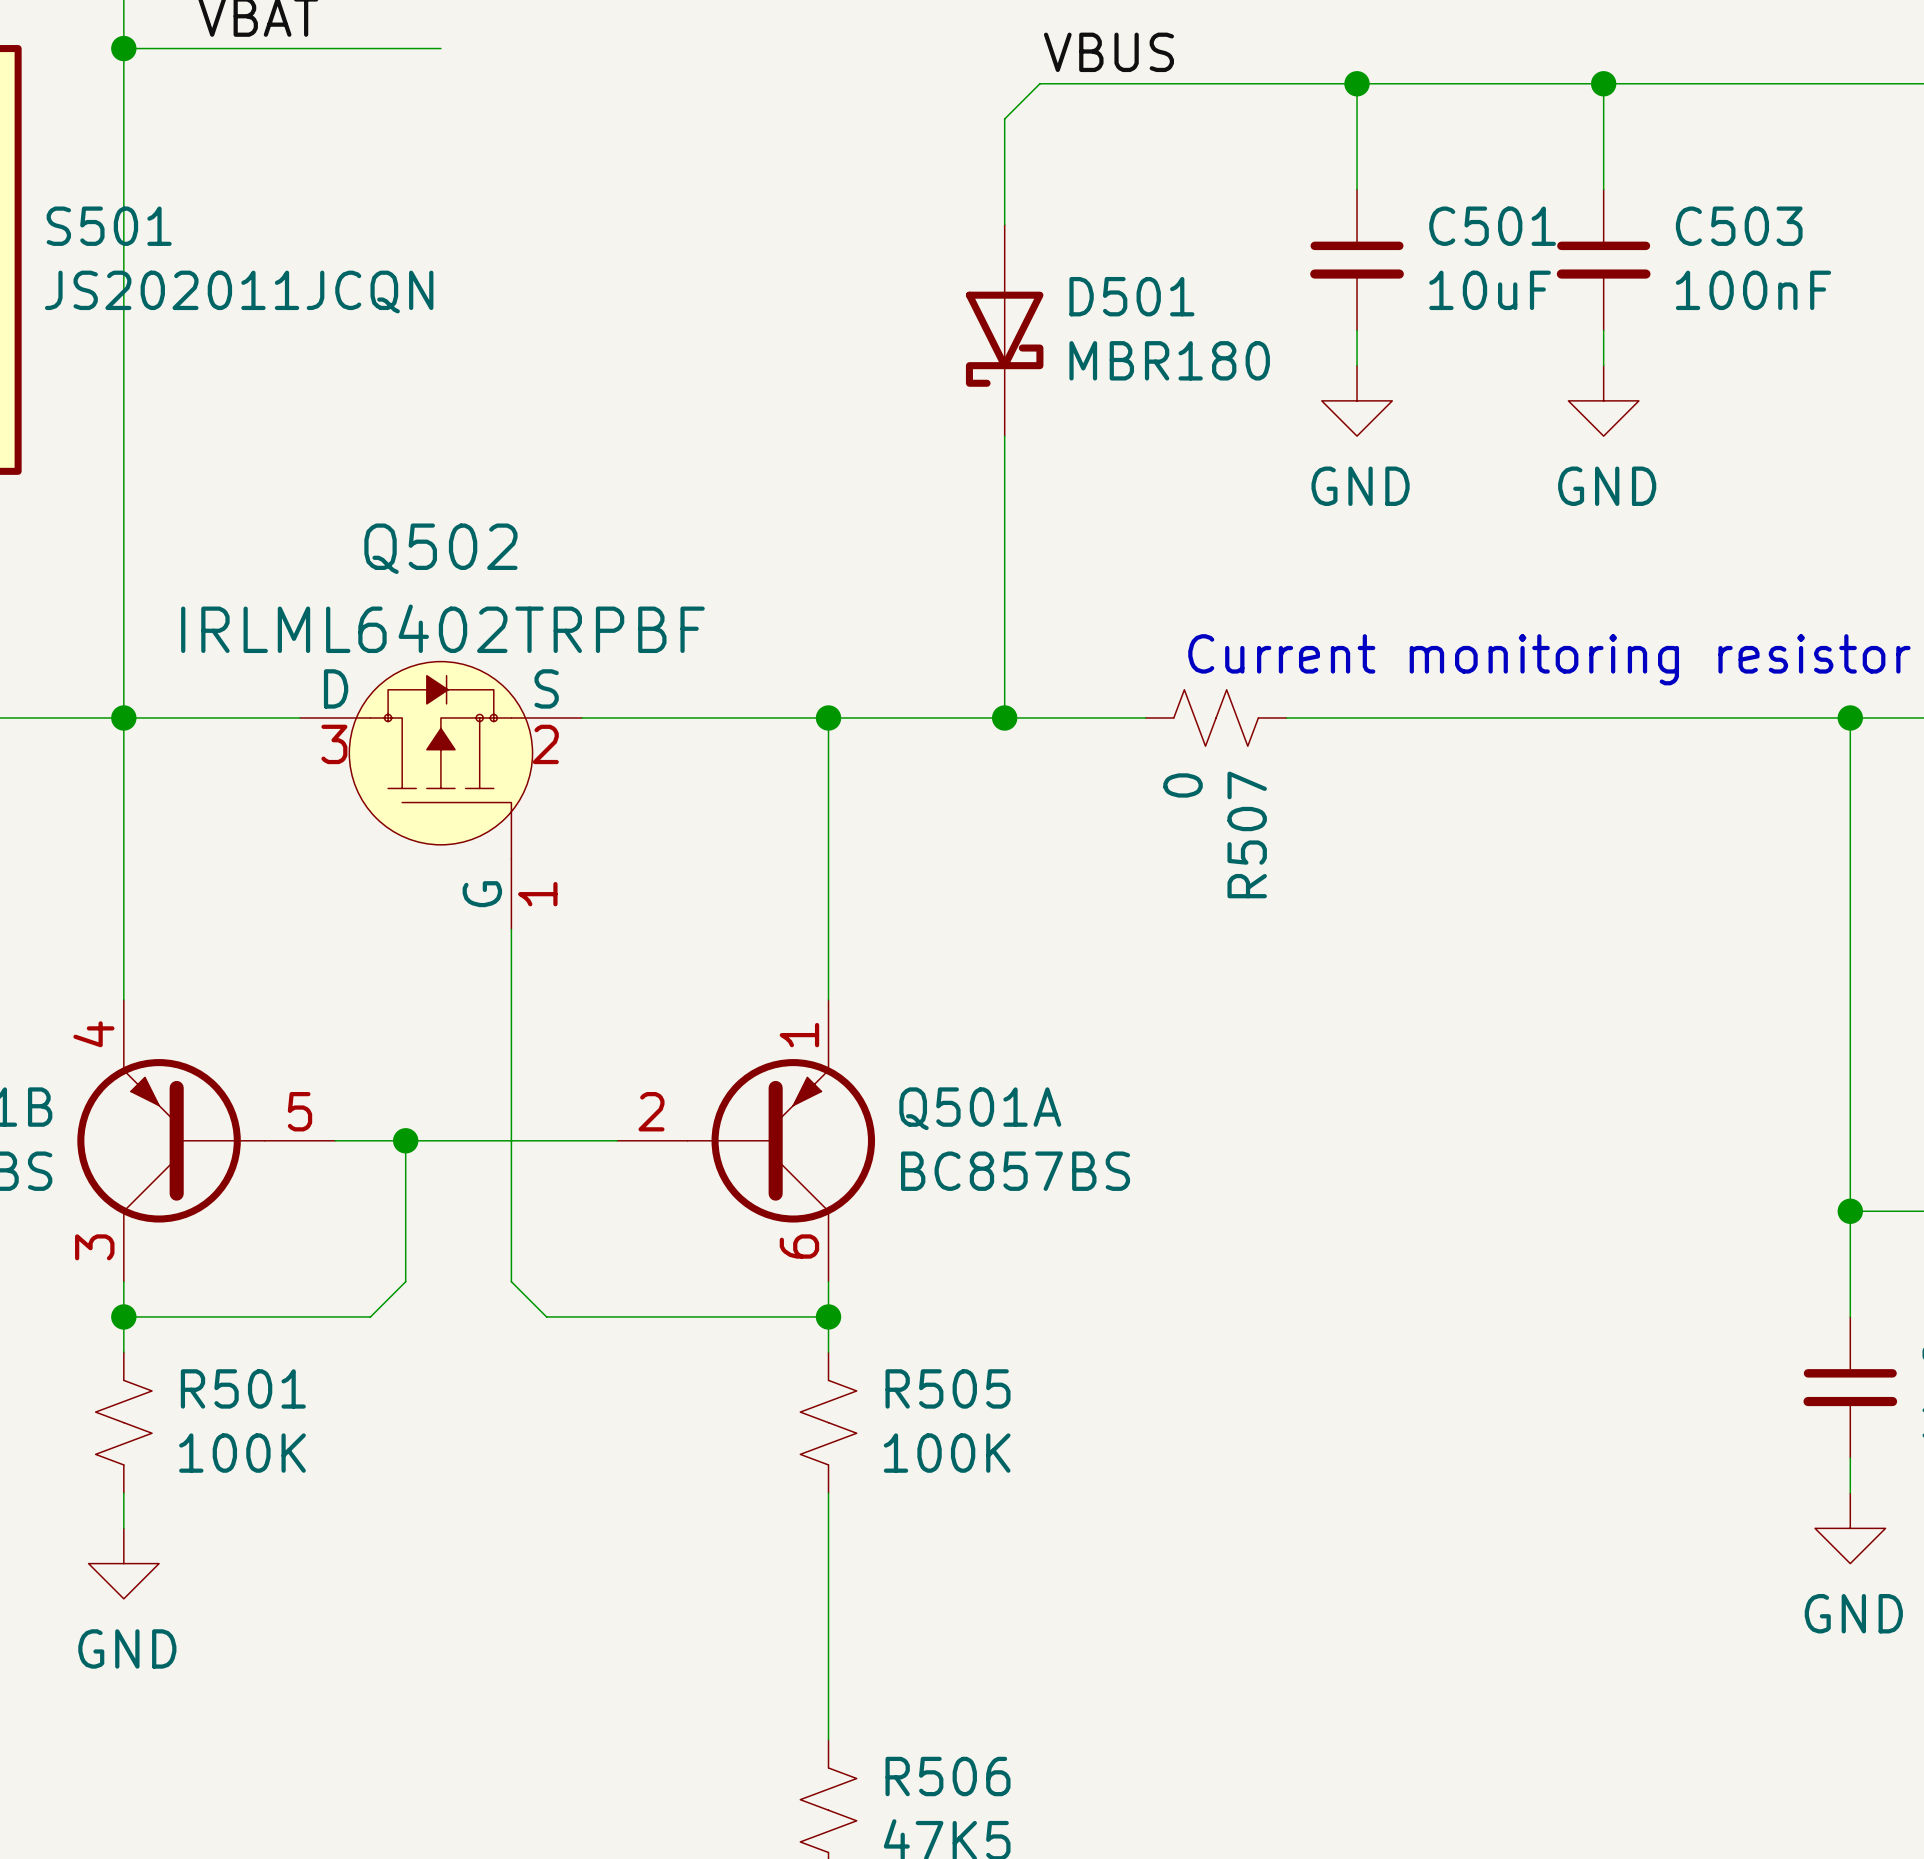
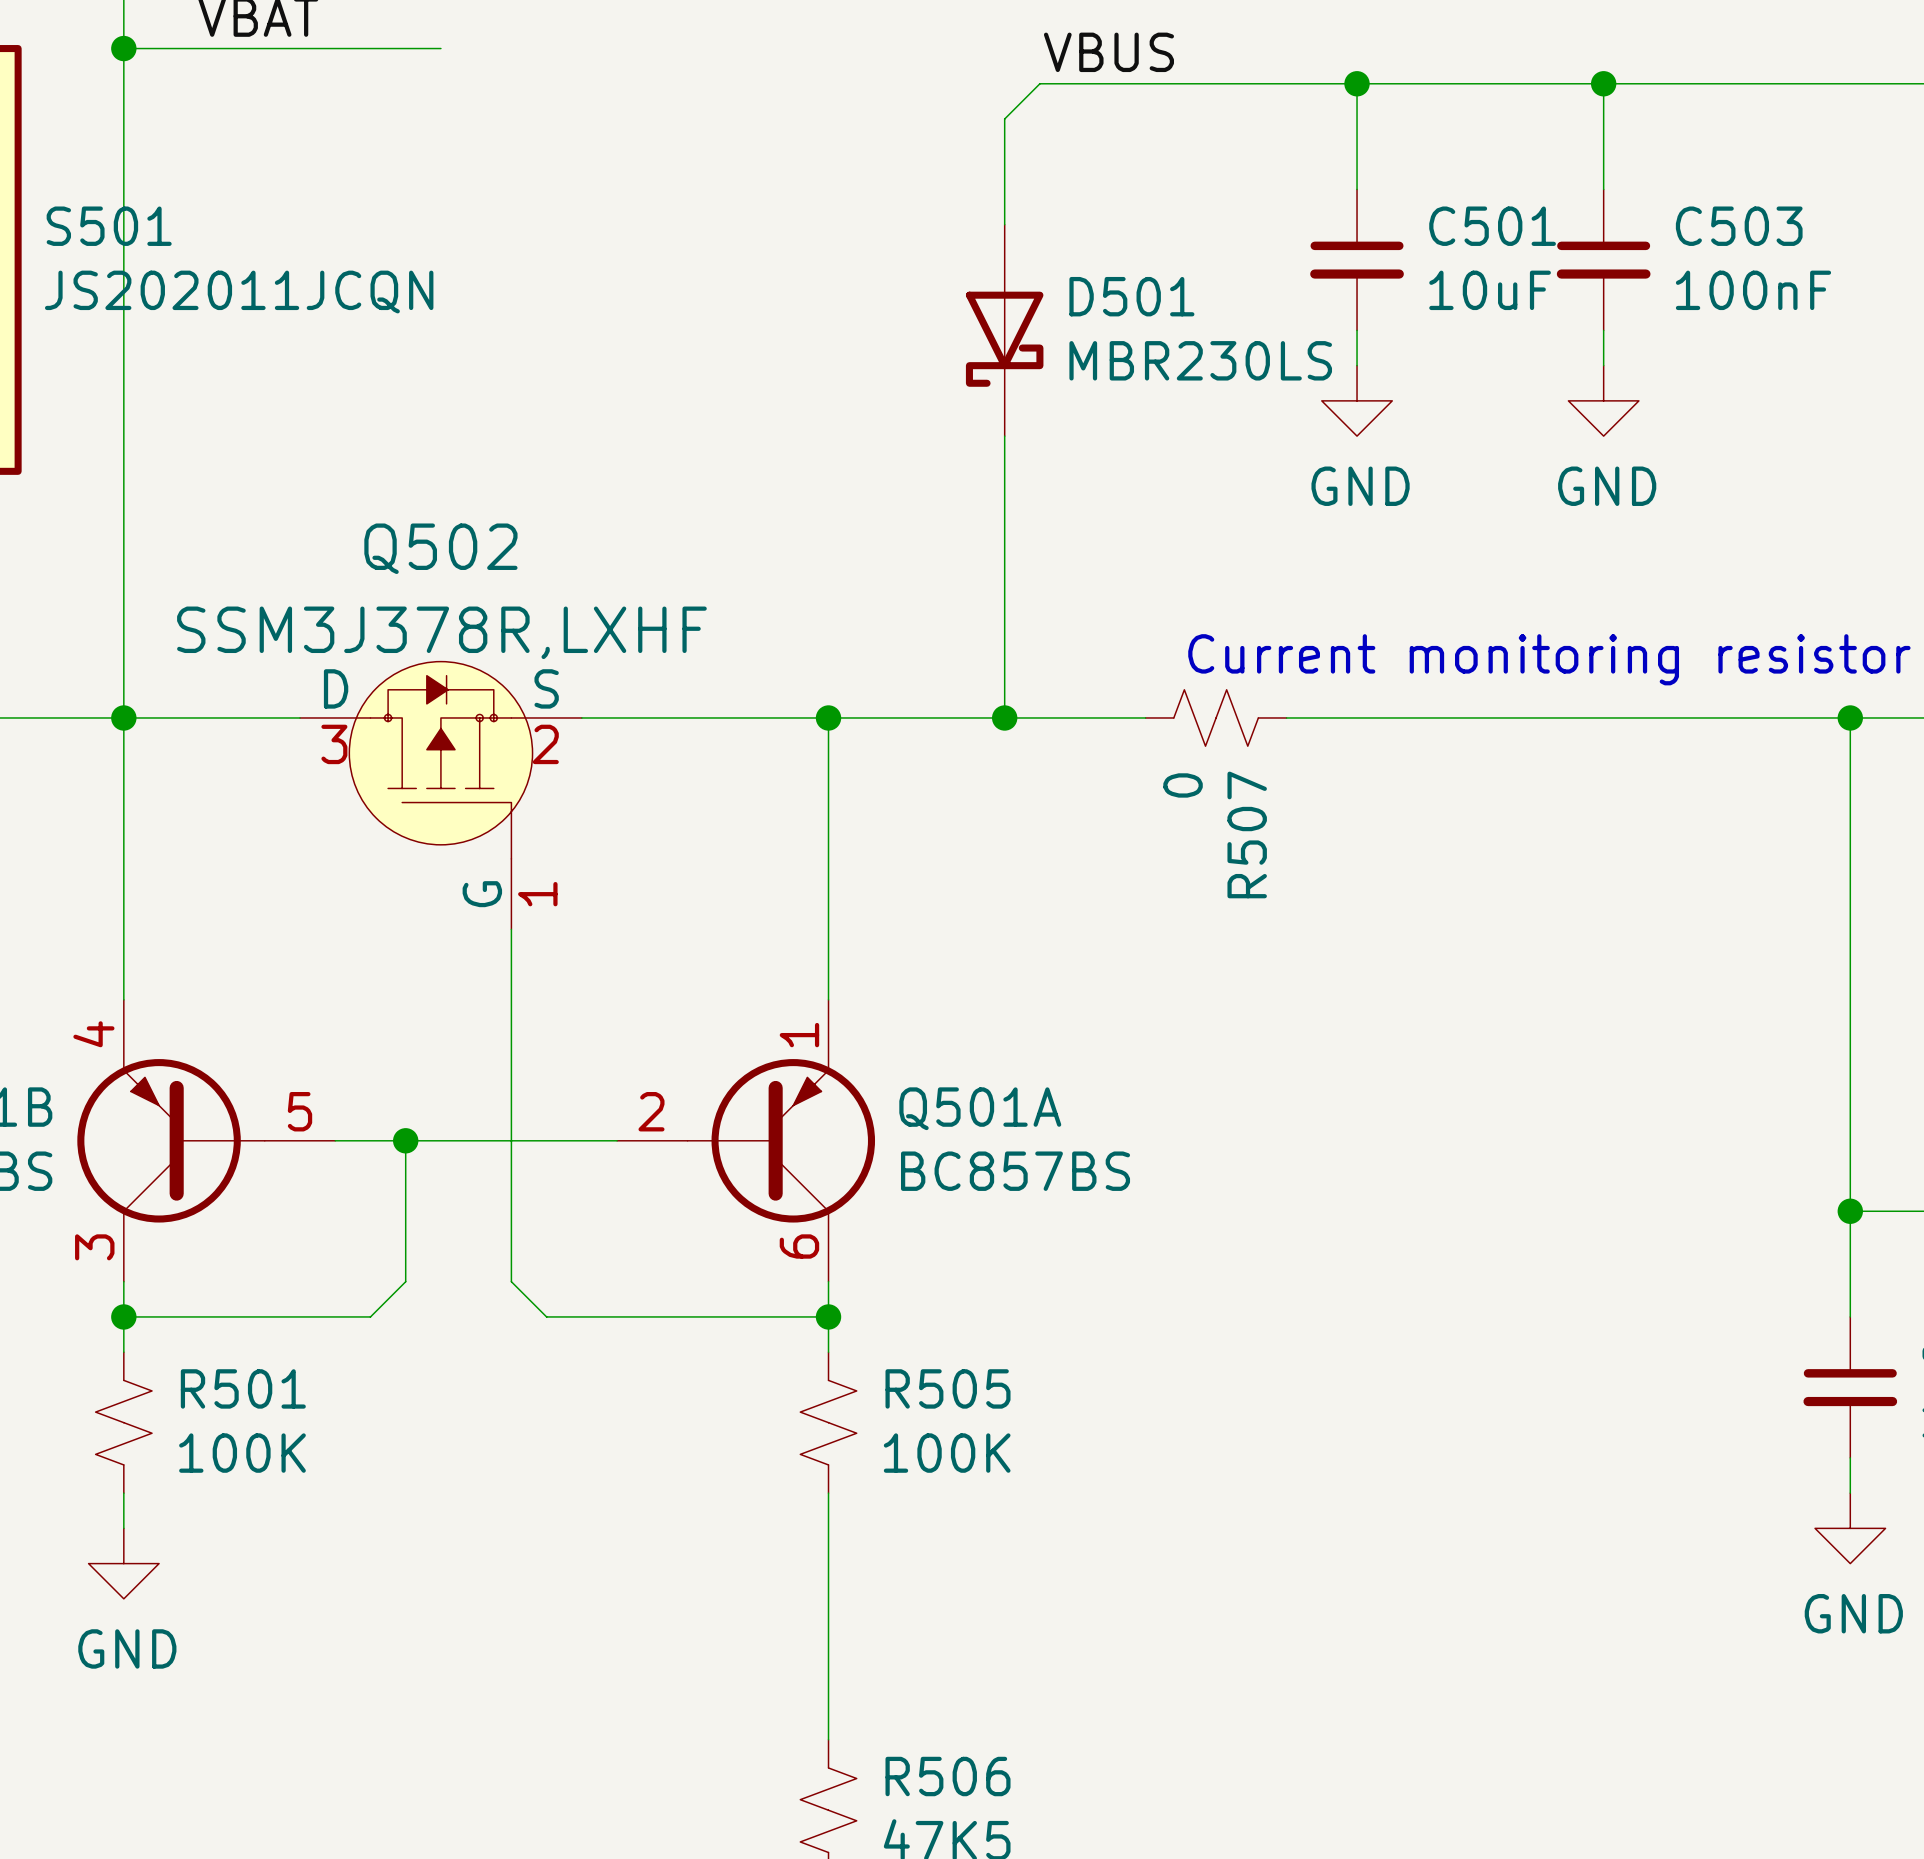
D501 value: MBR180 (1169, 360) -> MBR230LS (1200, 360)
Q502 value: IRLML6402TRPBF (442, 628) -> SSM3J378R,LXHF (441, 632)

